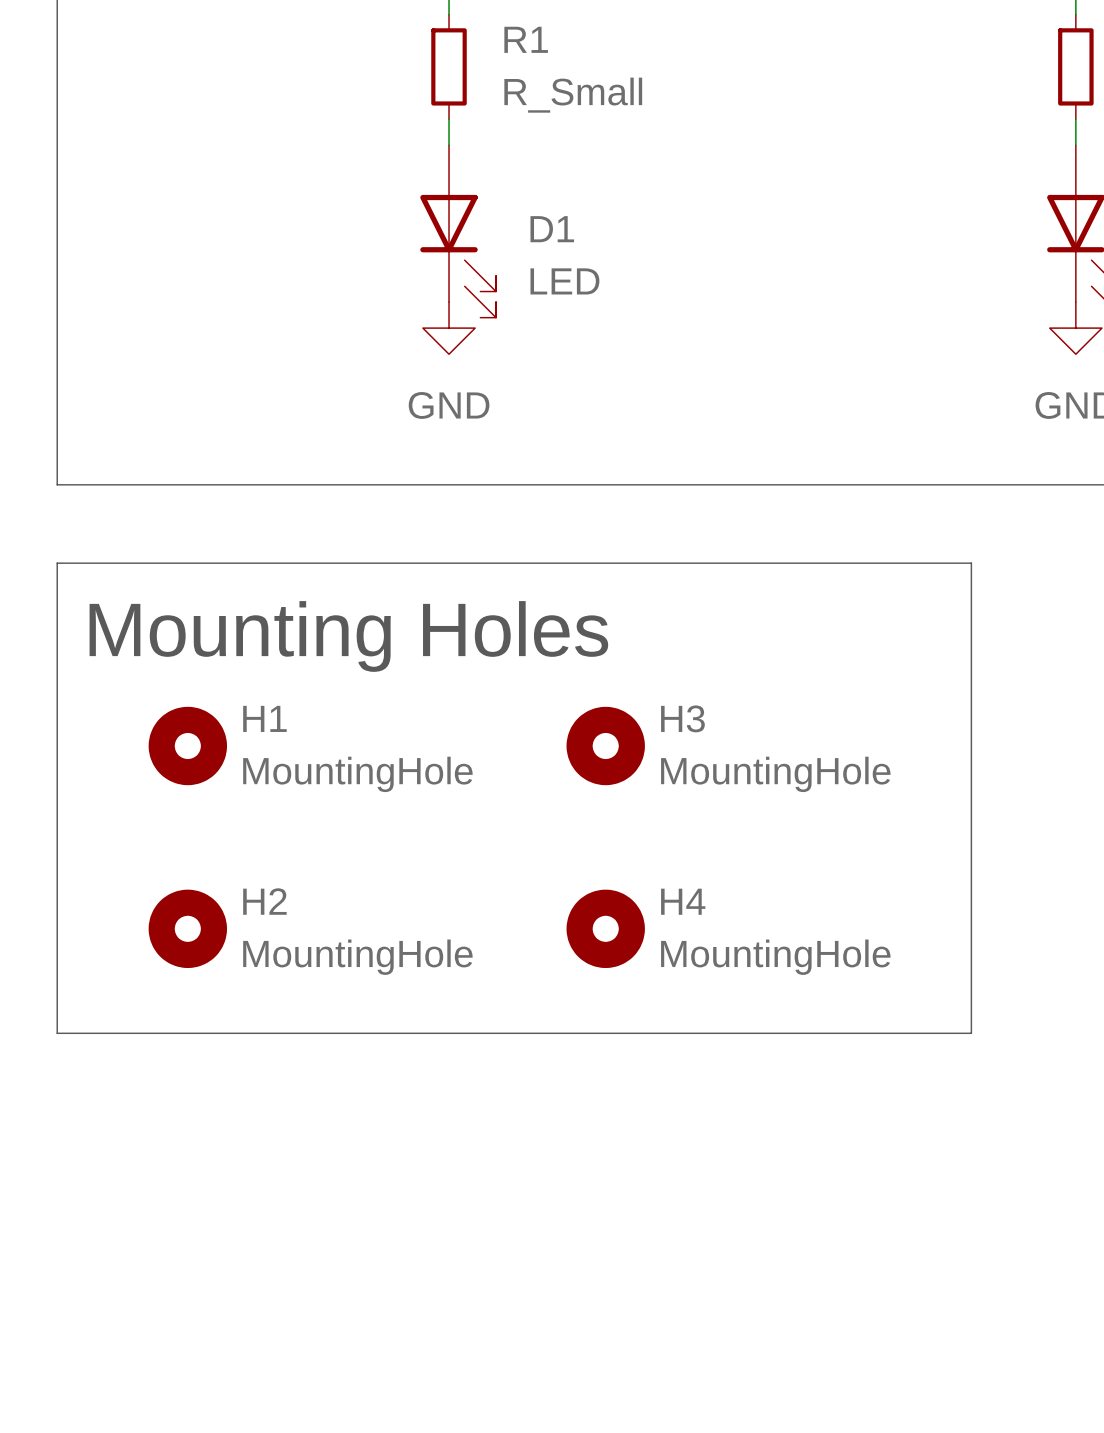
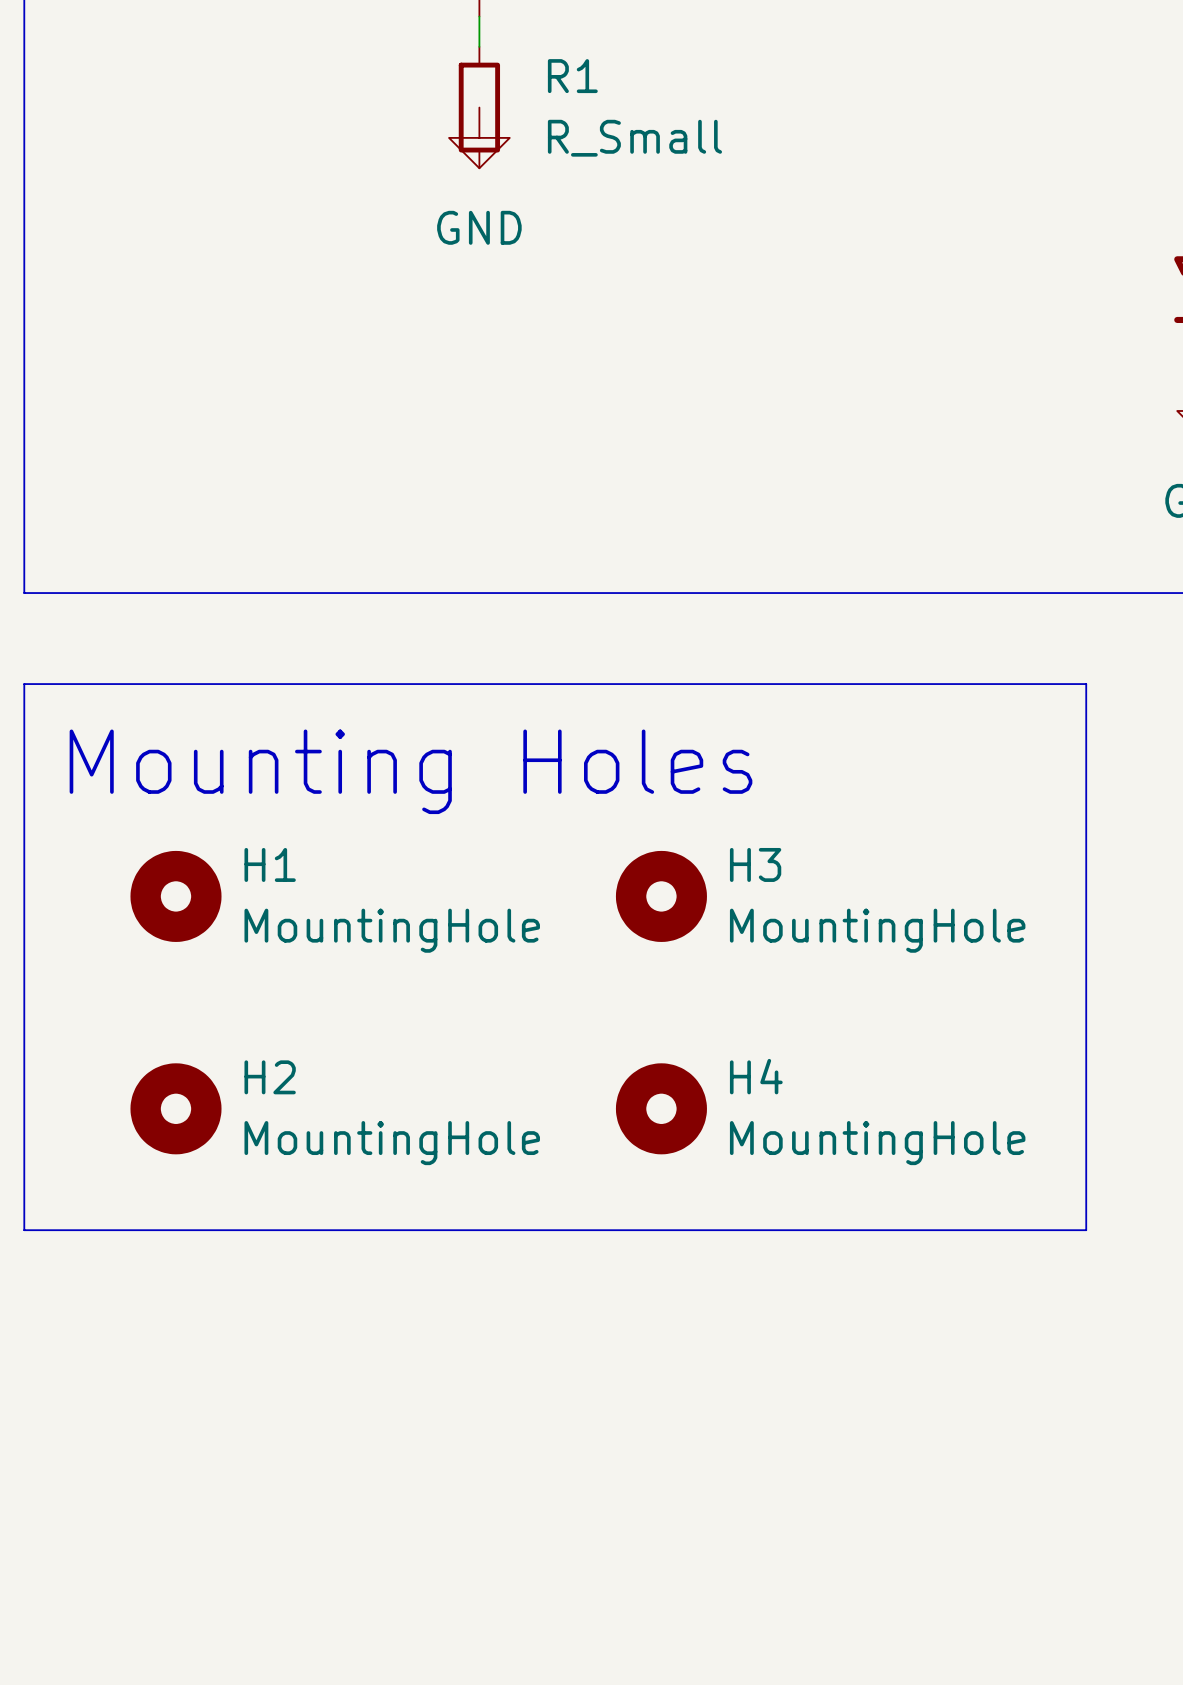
wire: (449, 119) (449, 145) -> none
D1: LED (458, 231) -> none
power symbol position: GND (449, 328) -> GND (479, 137)

